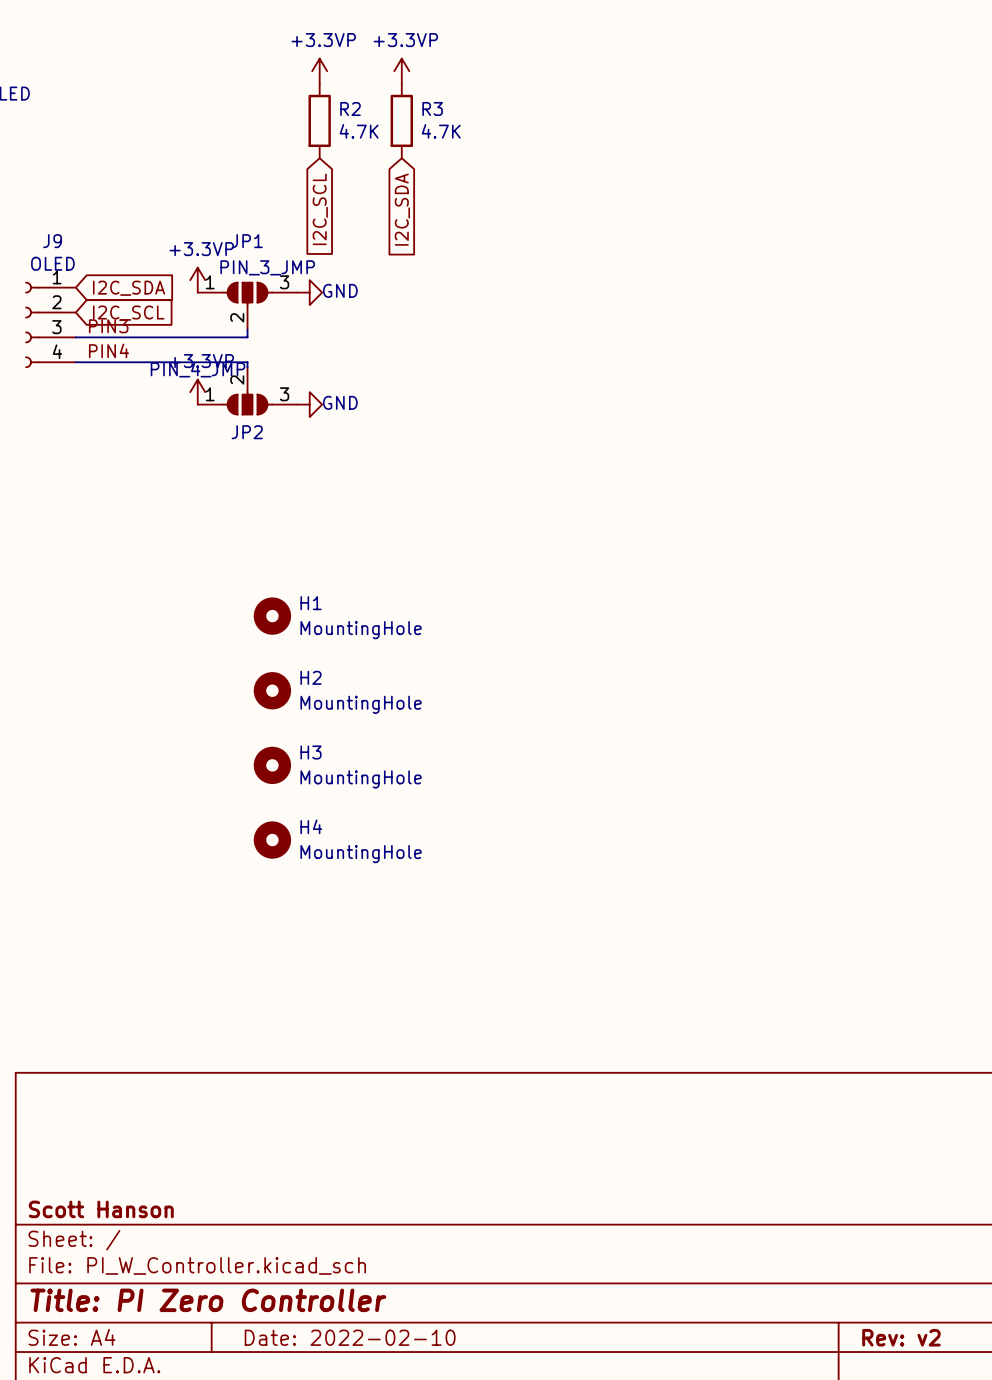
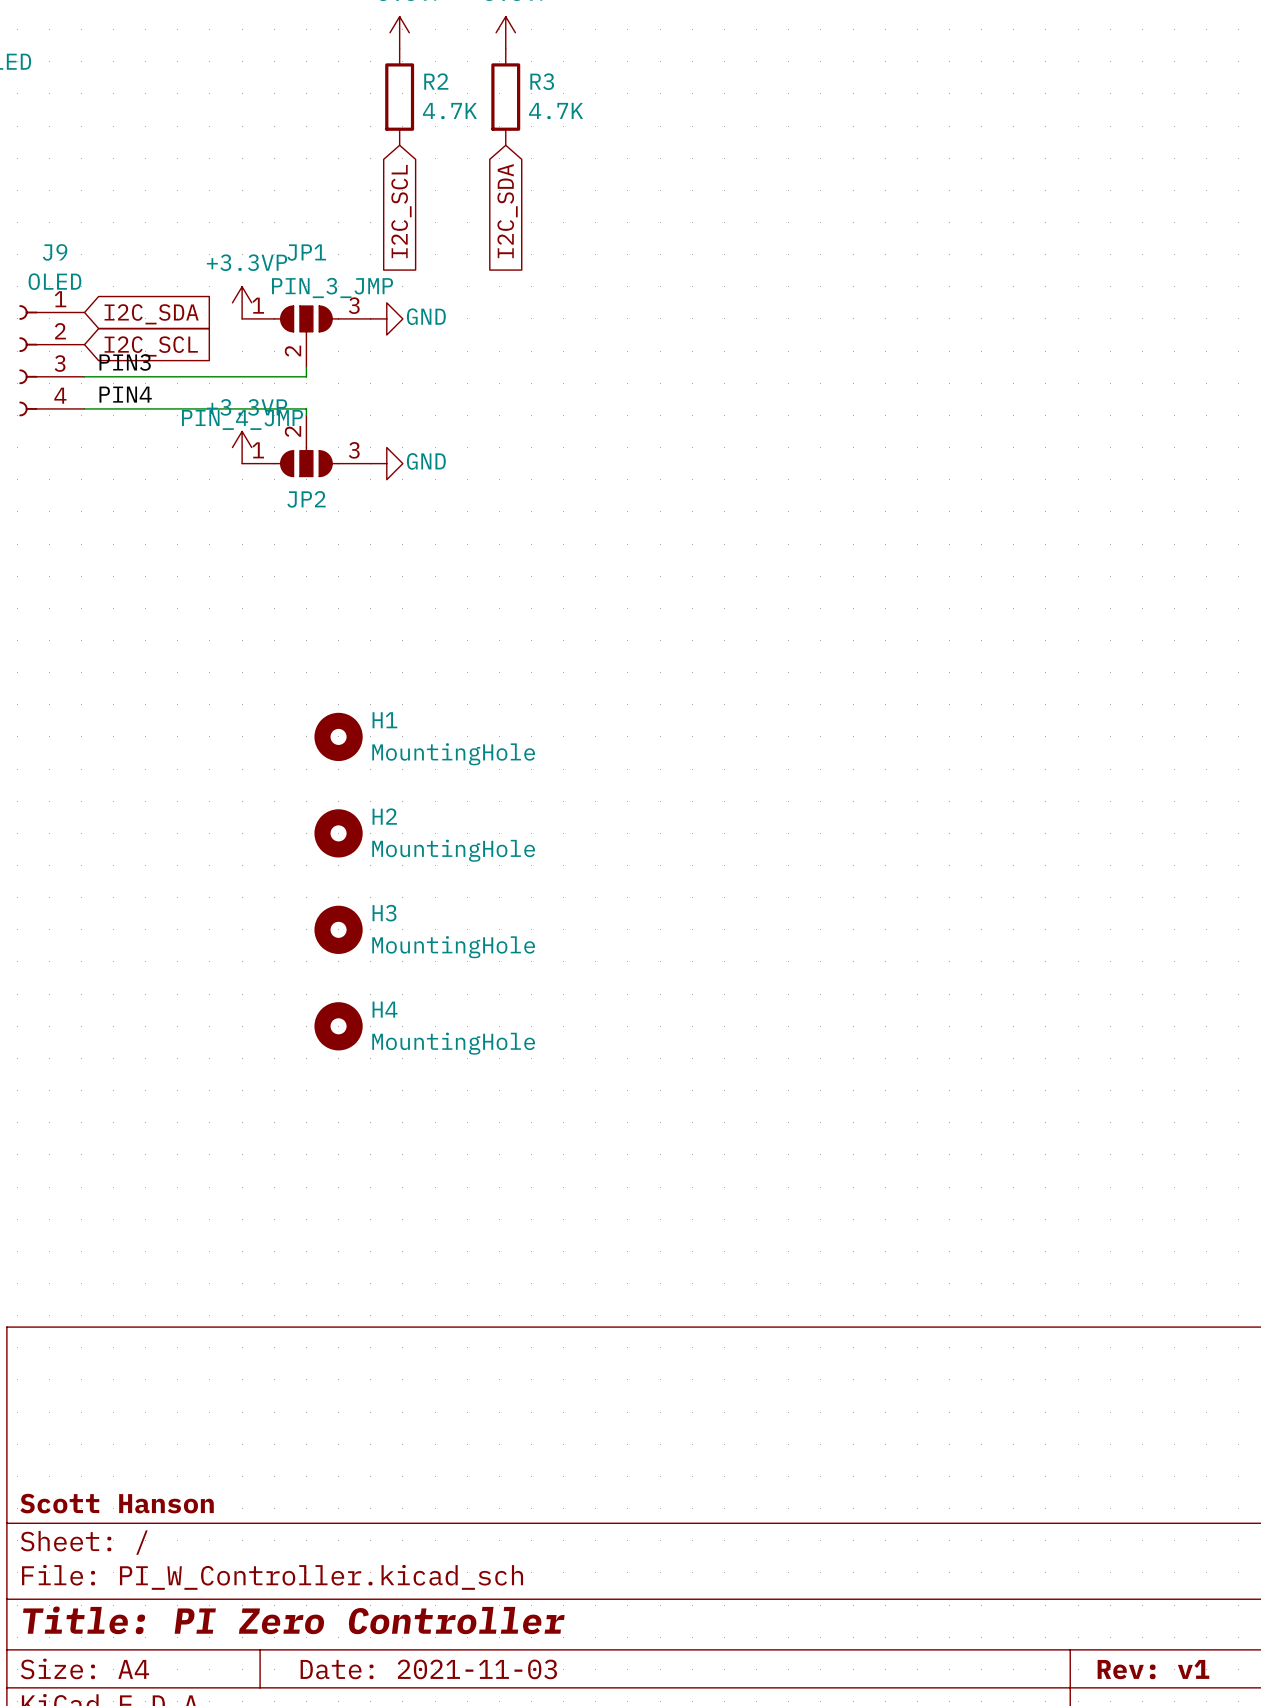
title block: Date: 2022-02-10 (350, 1337) -> Date: 2021-11-03 (428, 1669)
title block: Rev: v2 (901, 1337) -> Rev: v1 (1153, 1669)

